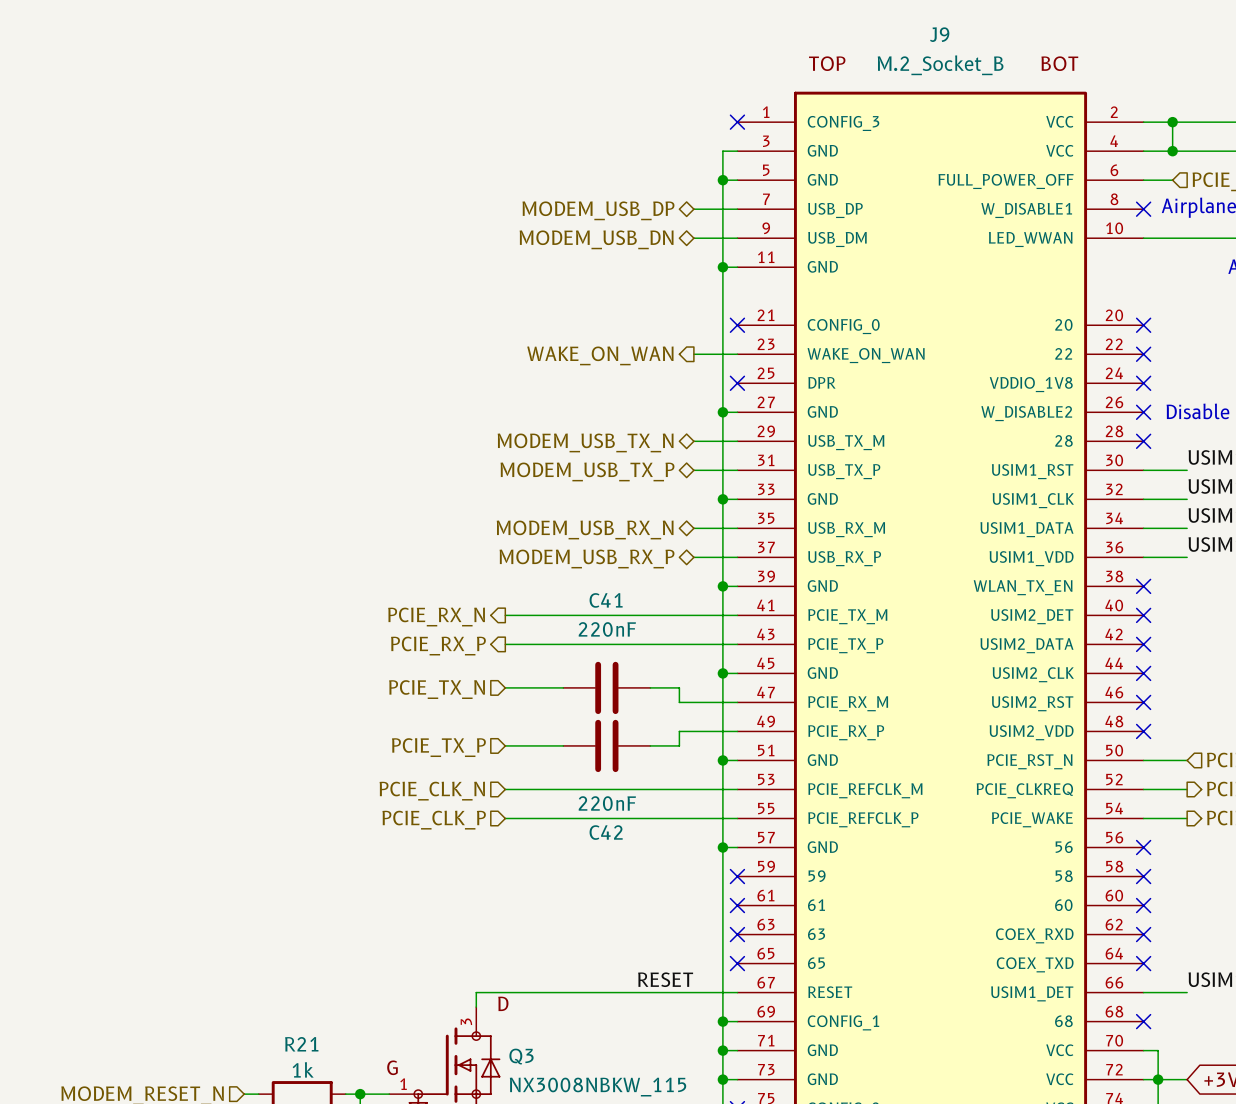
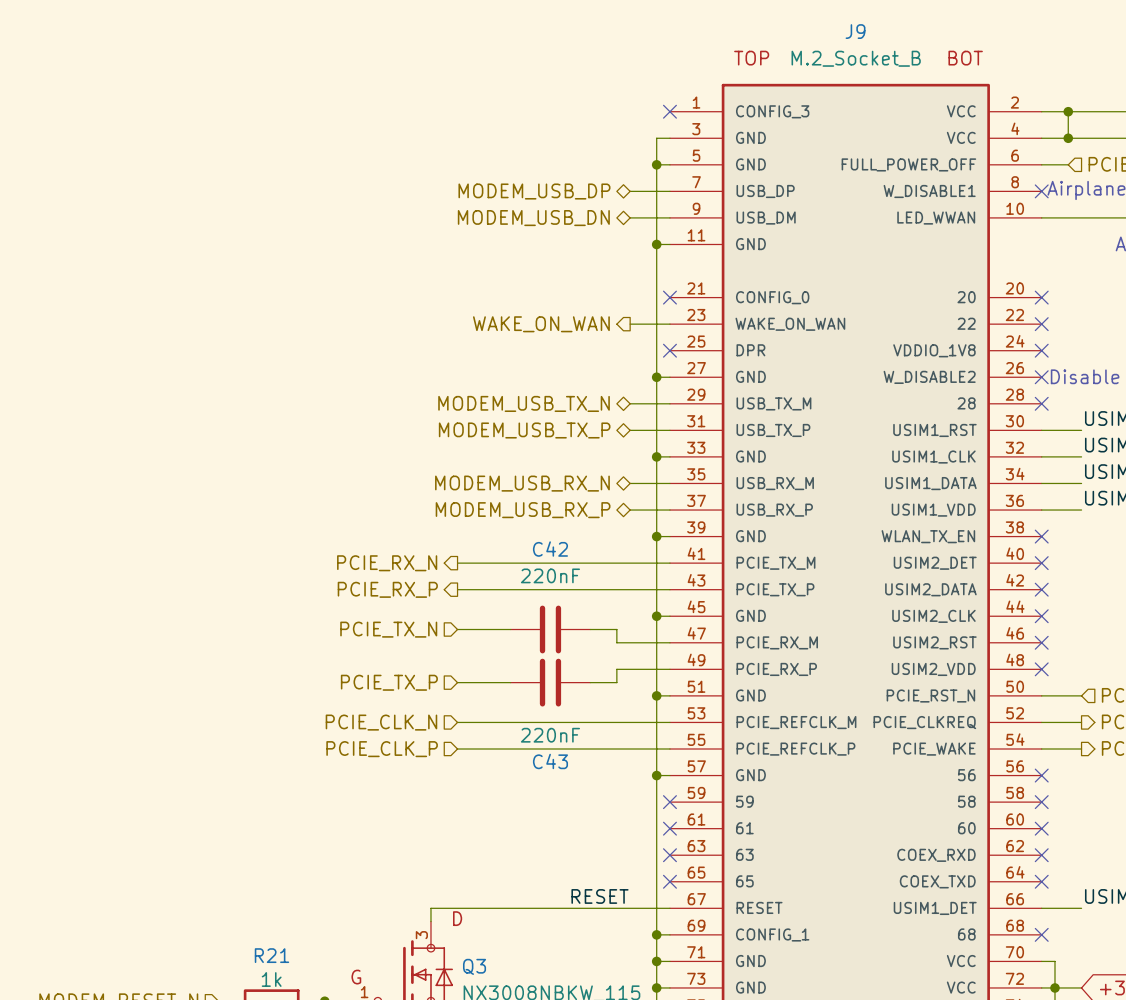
C41 name: C41 (606, 600) -> C42 (550, 549)
C42 name: C42 (606, 832) -> C43 (550, 761)

